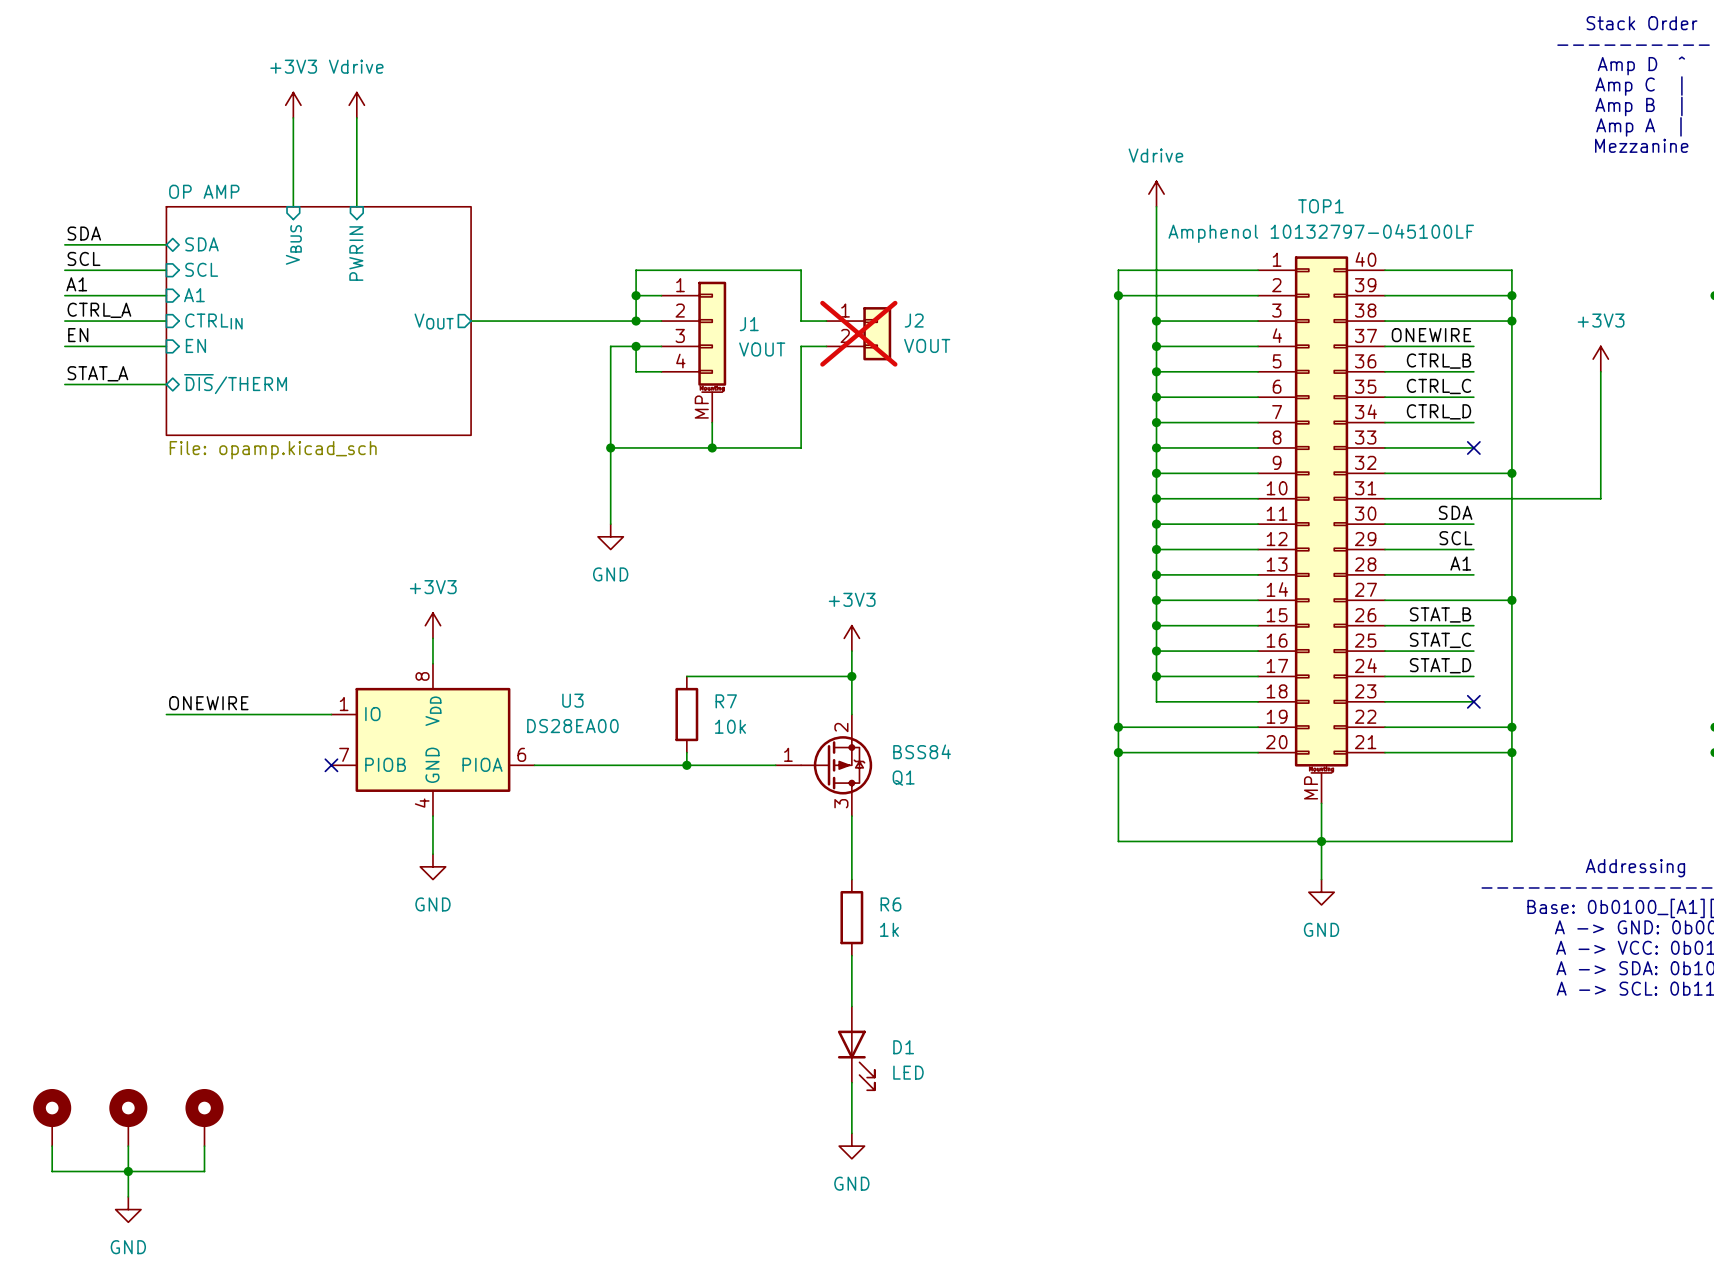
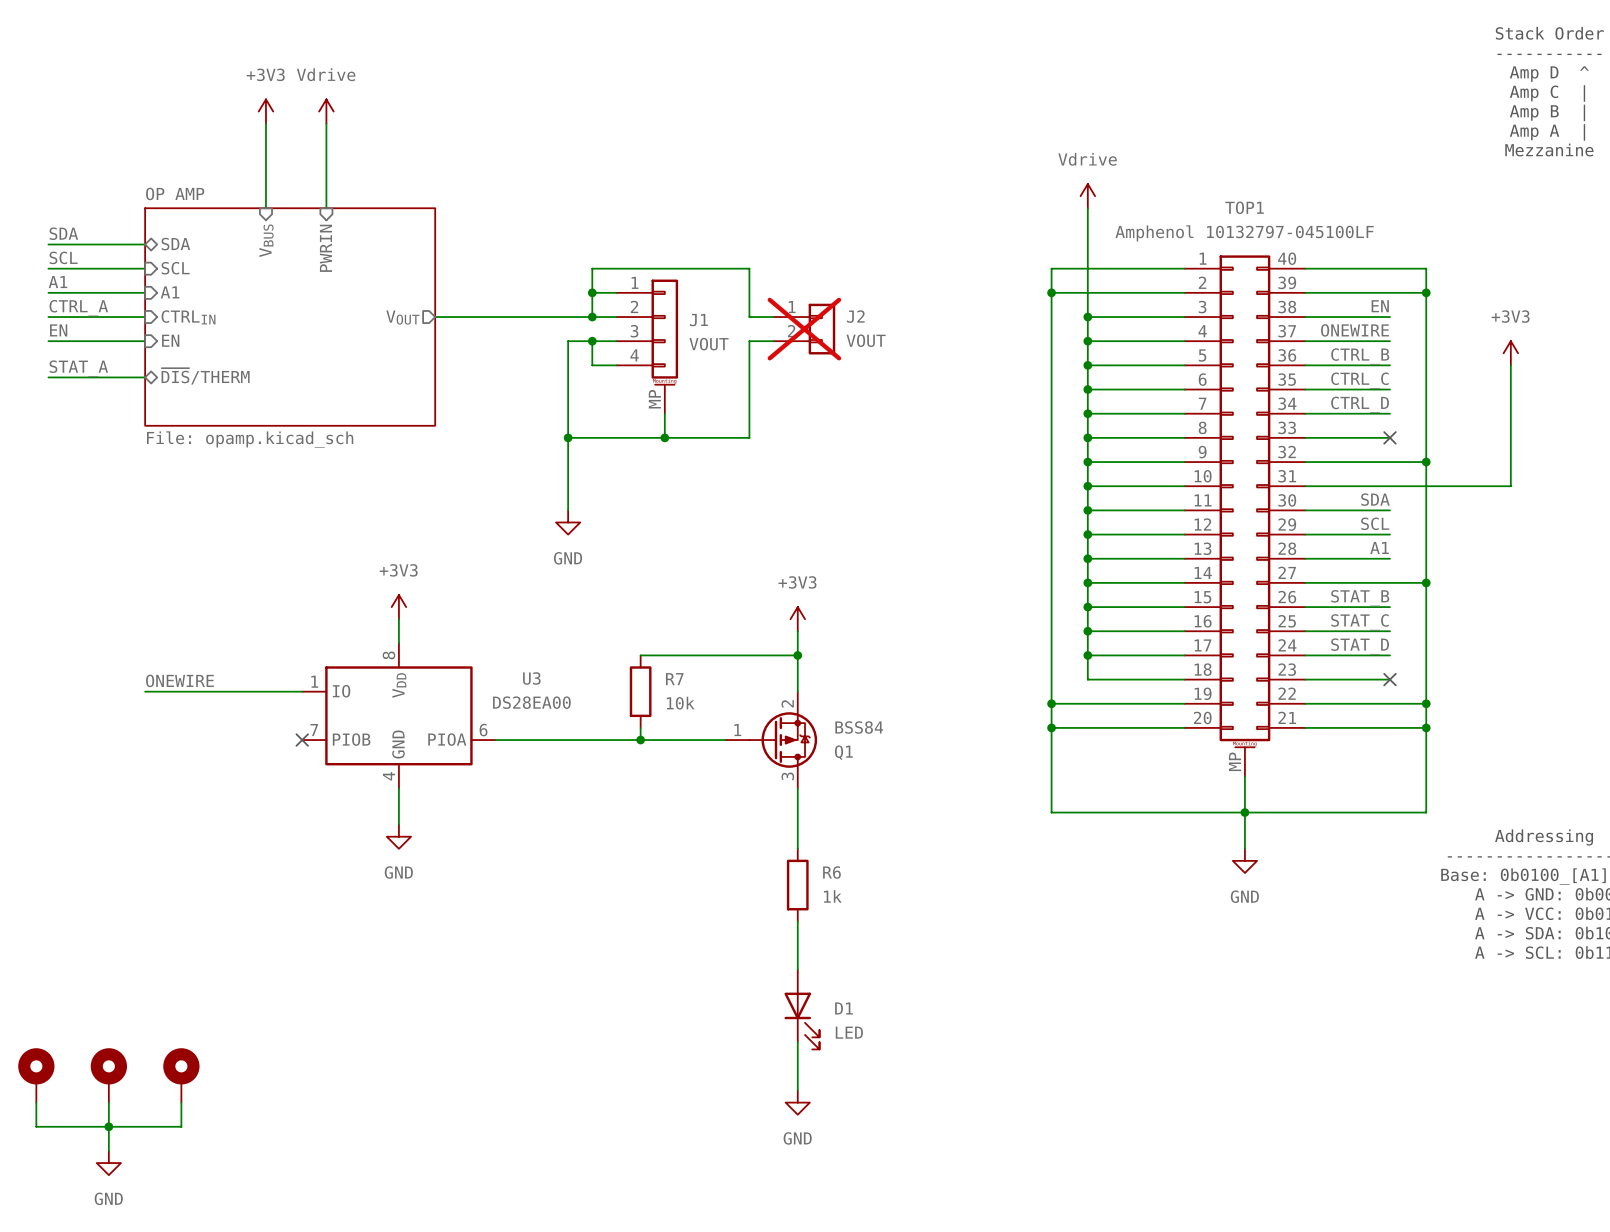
label: none -> EN (1380, 306)
wire: (1473, 321) (1511, 321) -> none
junction: (1511, 321) -> none

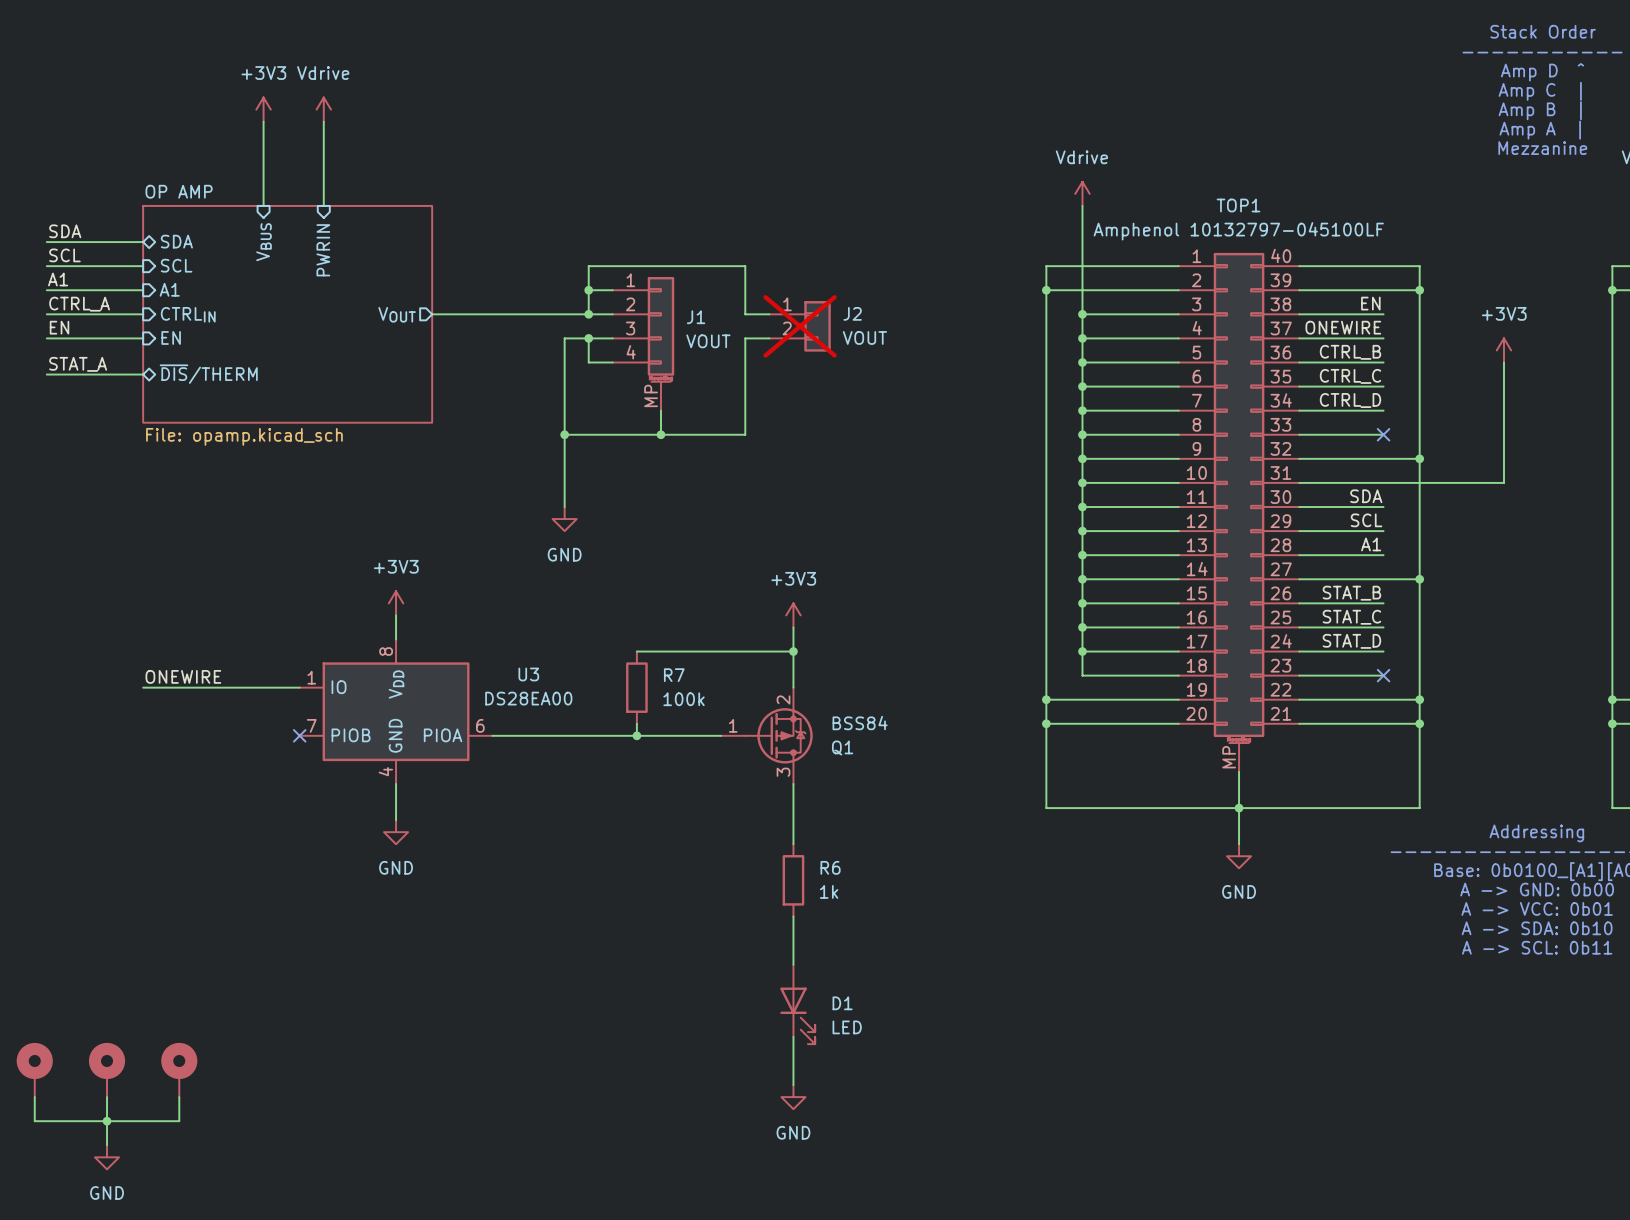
R7 value: 10k (680, 703) -> 100k (684, 699)

